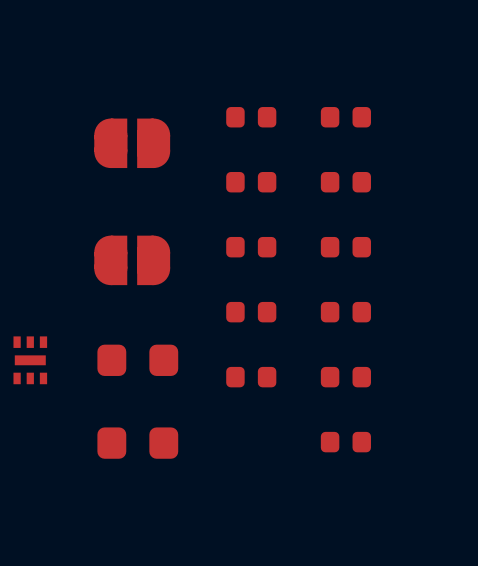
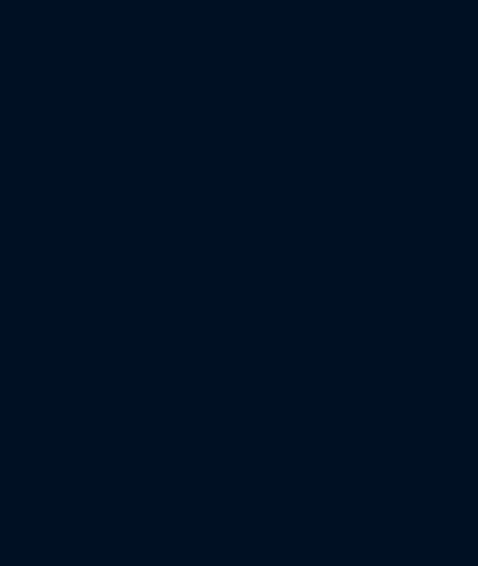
part: (251, 117) -> none
part: (345, 117) -> none
part: (132, 143) -> none
part: (251, 182) -> none
part: (345, 182) -> none
part: (251, 247) -> none
part: (345, 247) -> none
part: (132, 260) -> none
part: (251, 312) -> none
part: (345, 312) -> none
part: (30, 360) -> none
part: (137, 360) -> none
part: (251, 377) -> none
part: (345, 377) -> none
part: (345, 442) -> none
part: (137, 443) -> none

